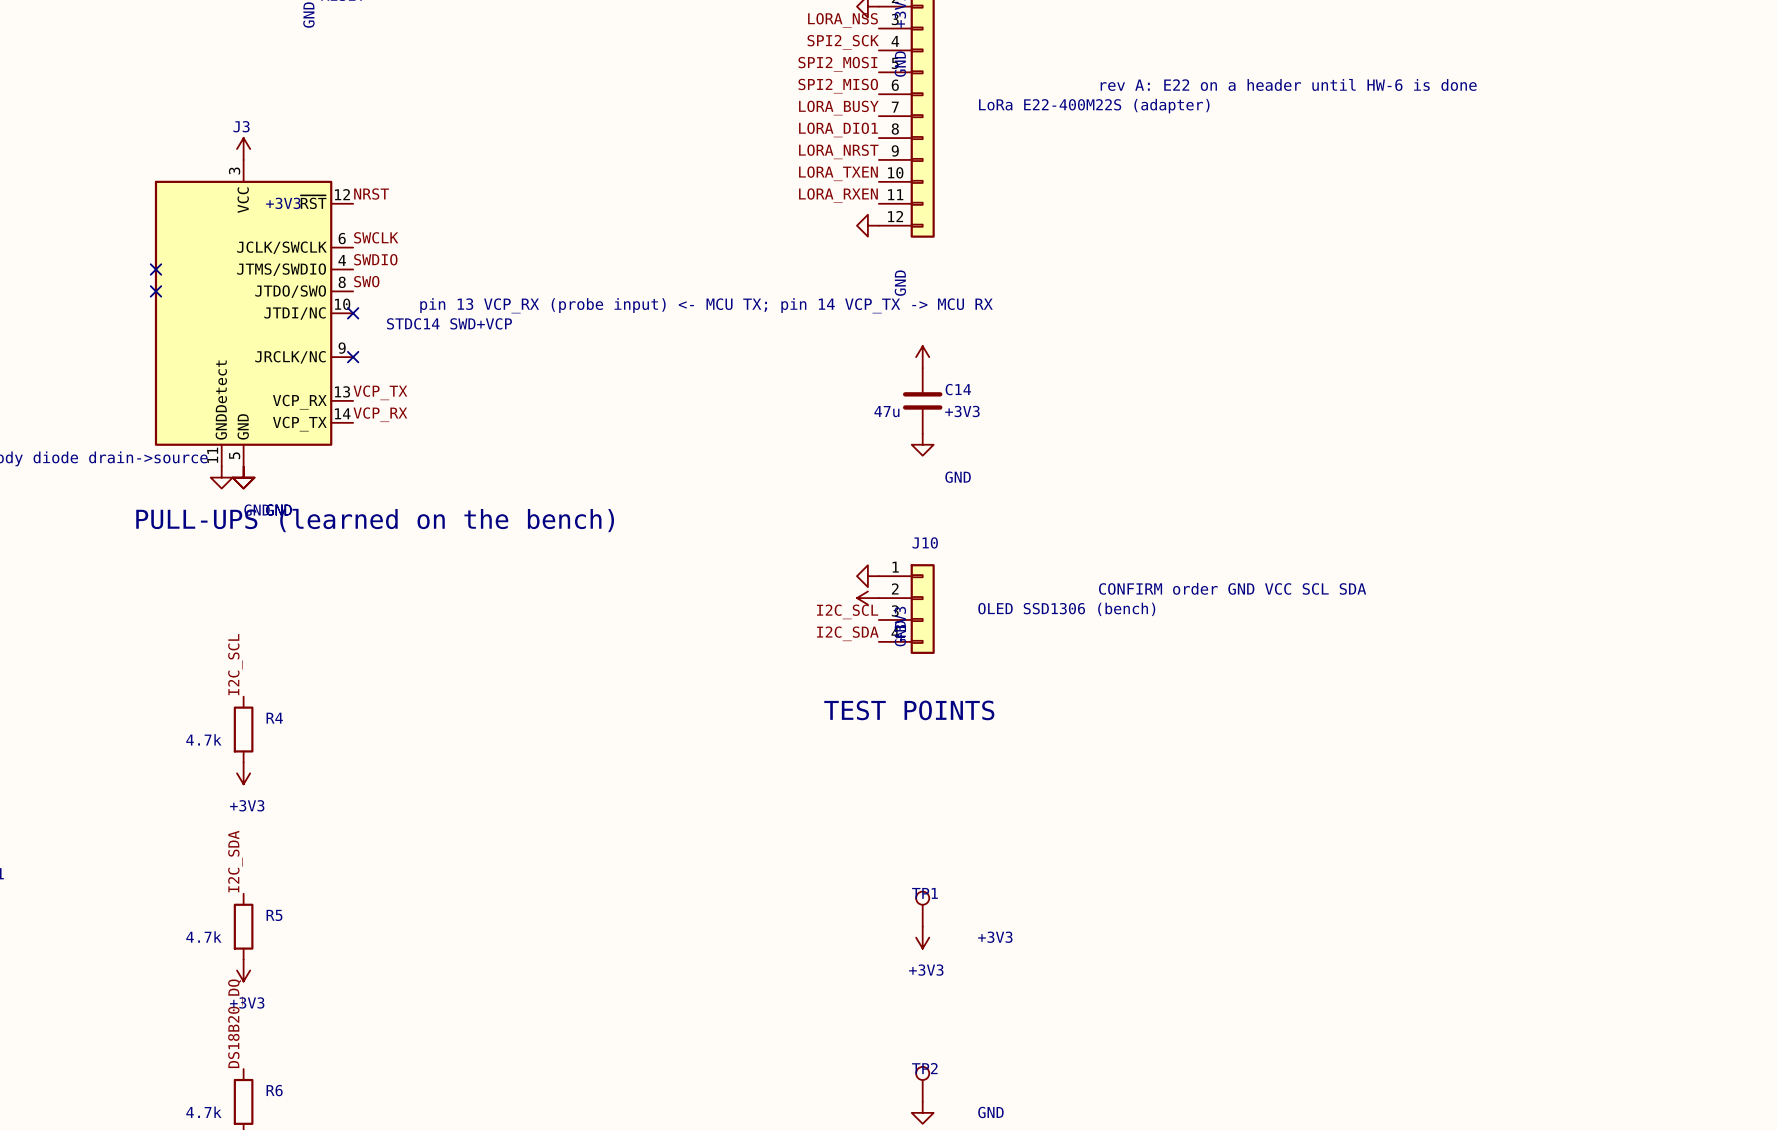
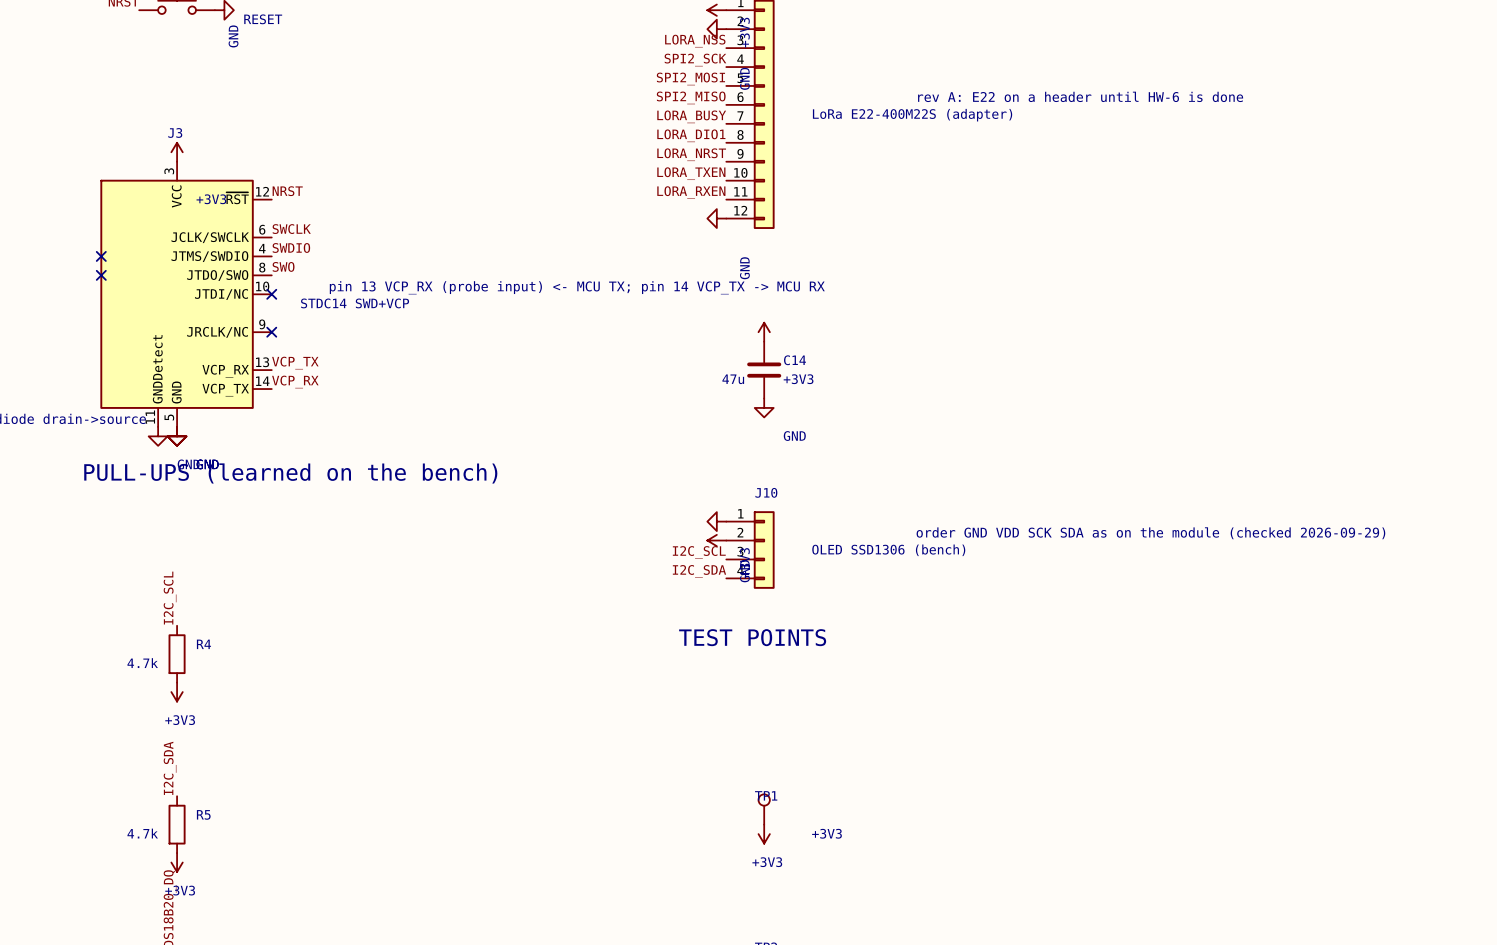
text: CONFIRM order GND VCC SCL SDA (1232, 588) -> order GND VDD SCK SDA as on the module (checked 2026-09-29) (1150, 533)

